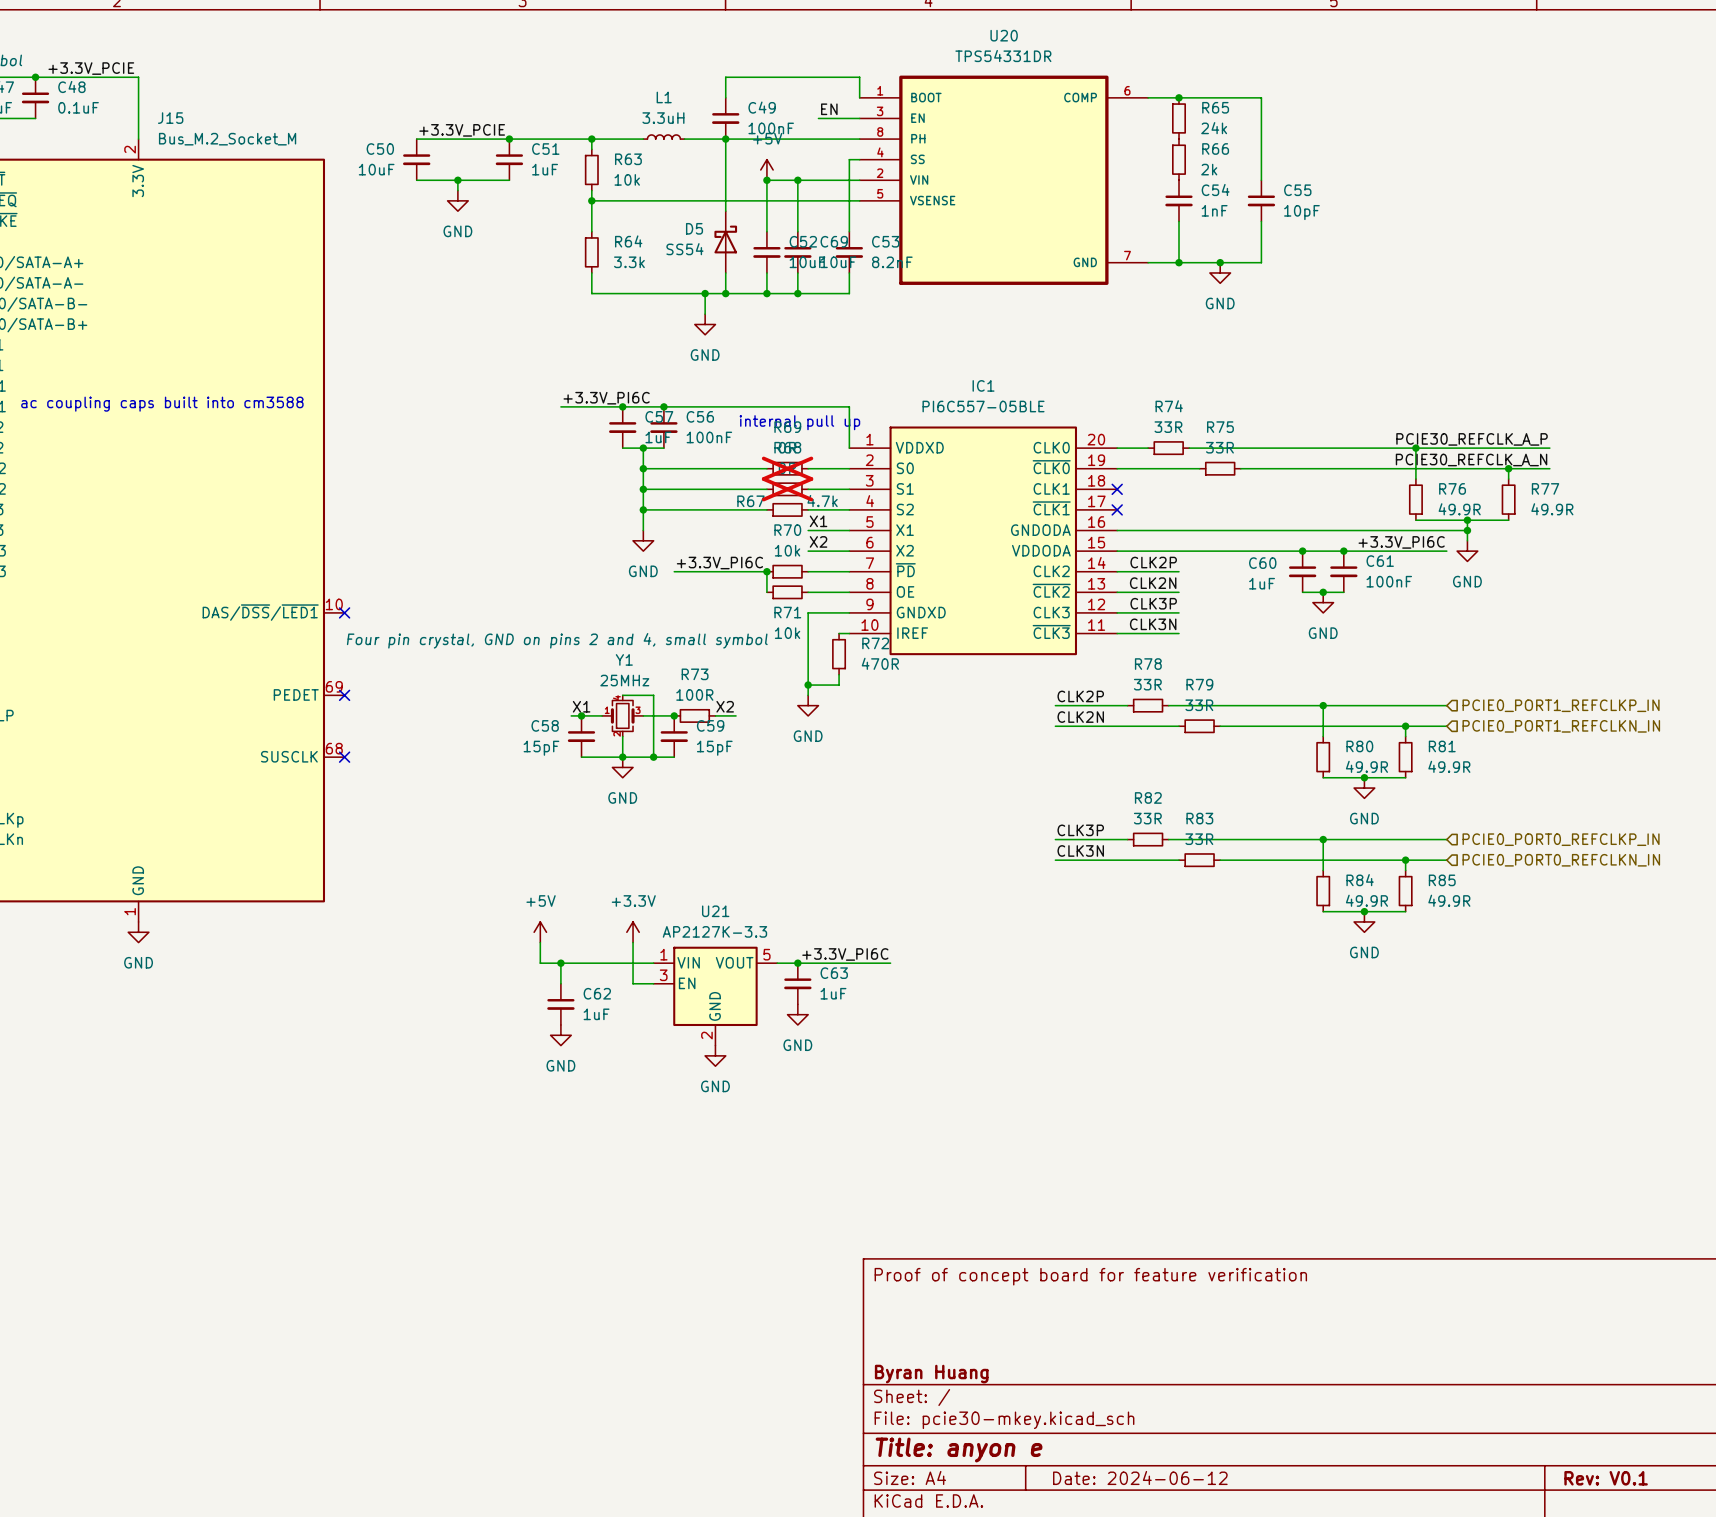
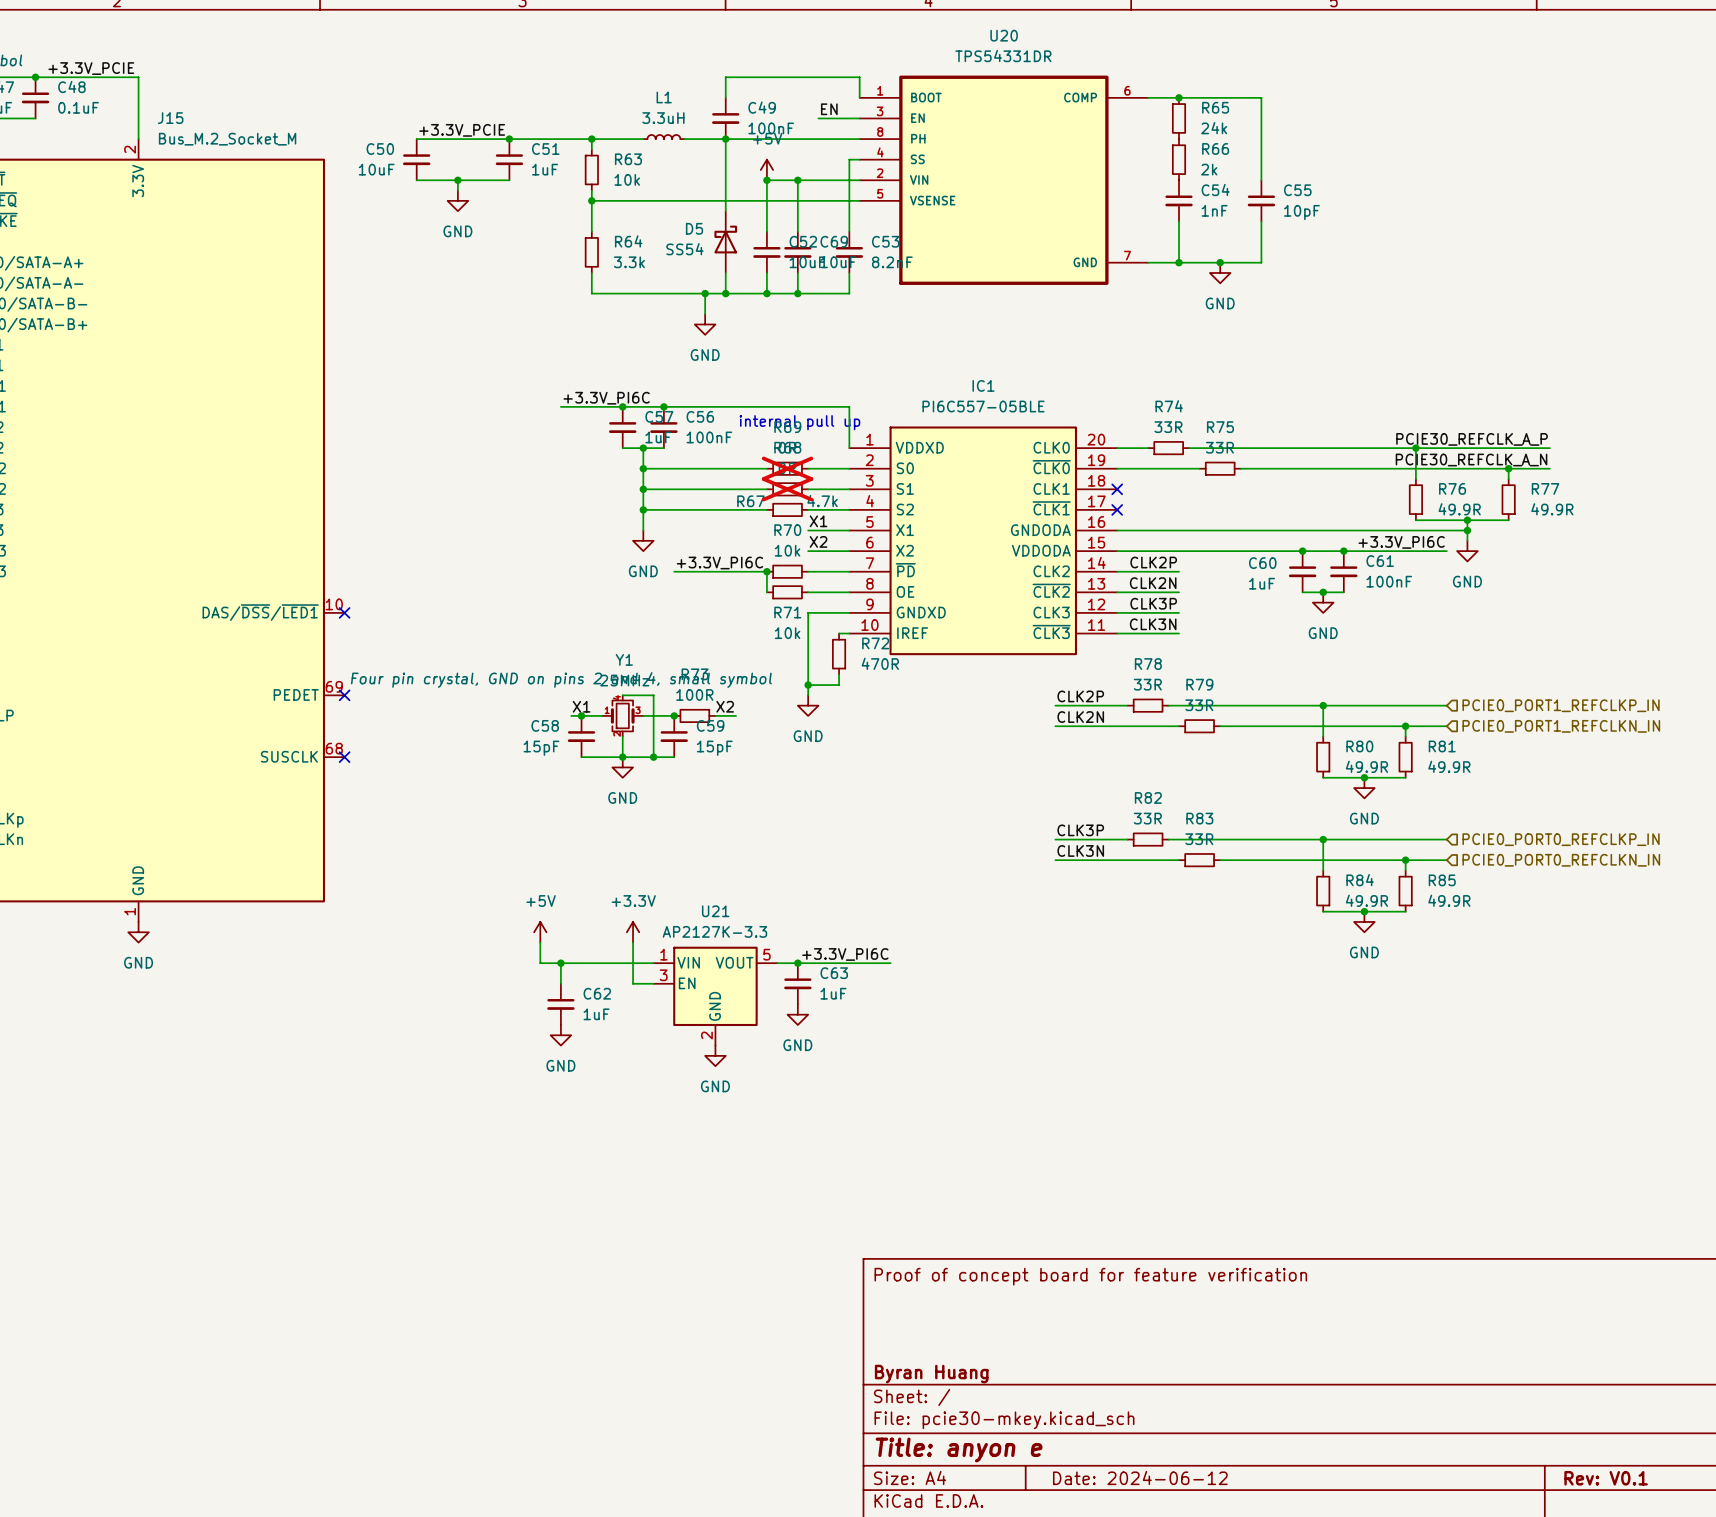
text: ac coupling caps built into cm3588 (162, 404) -> none
Y1 text position: Four pin crystal, GND on pins 2 and 4, small symbol (557, 640) -> Four pin crystal, GND on pins 2 and 4, small symbol (561, 679)

